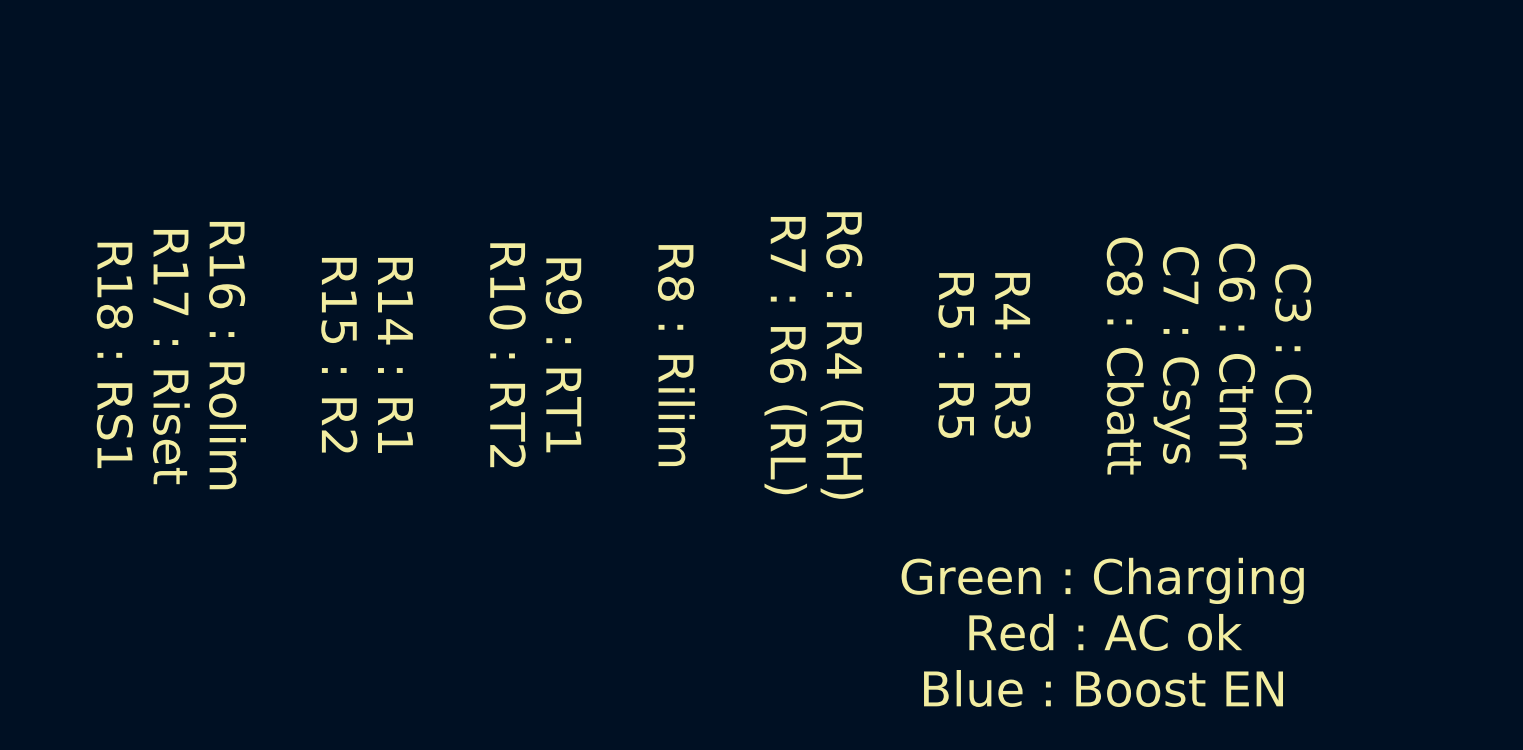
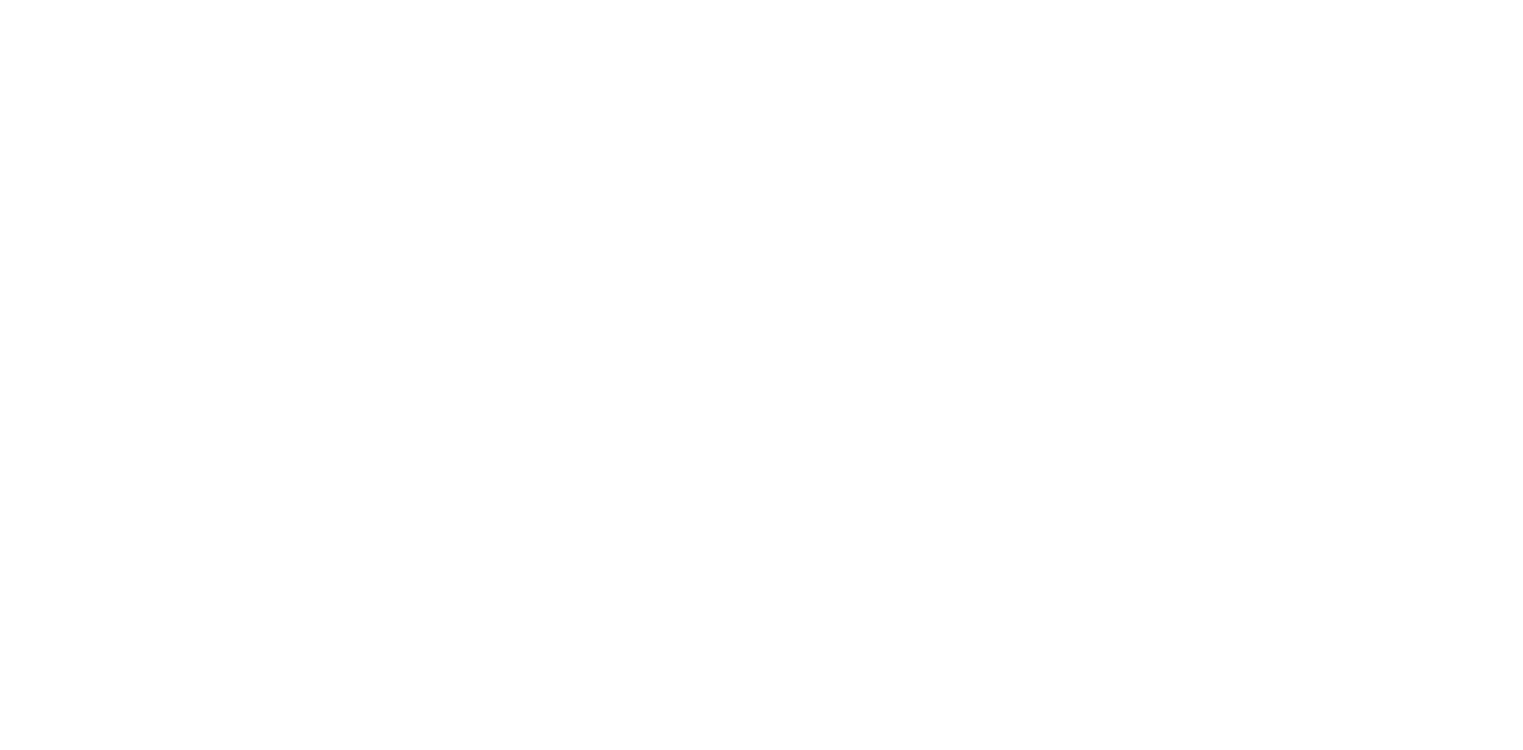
text: C3 : Cin (1293, 354) -> none
text: R18 : RS1 (114, 355) -> none
text: R16 : Rolim (227, 355) -> none
text: R15 : R2 (339, 355) -> none
text: R14 : R1 (395, 355) -> none
text: R10 : RT2 (507, 355) -> none
text: R9 : RT1 (563, 355) -> none
text: R8 : Rilim (676, 355) -> none
text: R7 : R6 (RL) (785, 355) -> none
text: R6 : R4 (RH) (841, 355) -> none
text: R5 : R5 (956, 355) -> none
text: R4 : R3 (1012, 355) -> none
text: C7 : Csys (1176, 355) -> none
text: C8 : Cbatt (1125, 356) -> none
text: C6 : Ctmr (1237, 356) -> none
text: R17 : Riset (171, 357) -> none
text: Green : Charging (1102, 580) -> none
text: Red : AC ok (1105, 632) -> none
text: Blue : Boost EN (1103, 688) -> none

